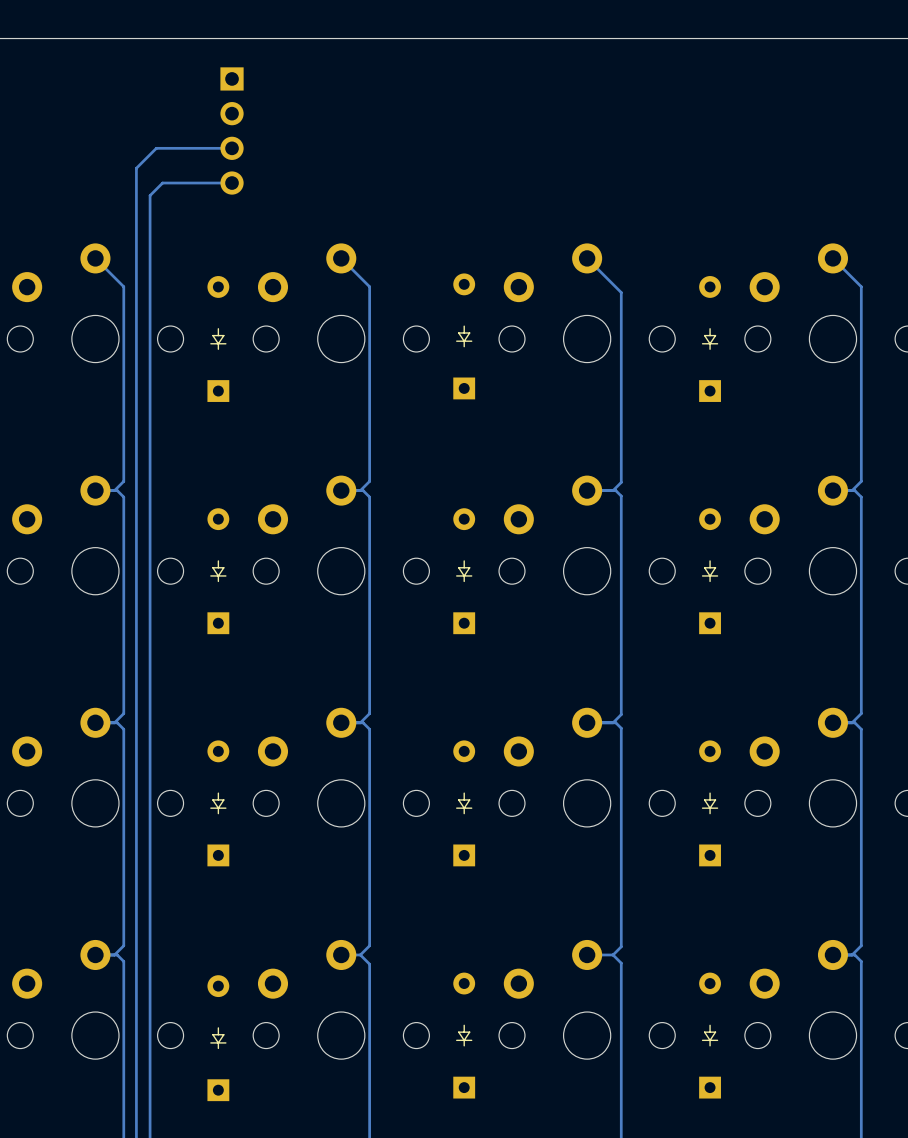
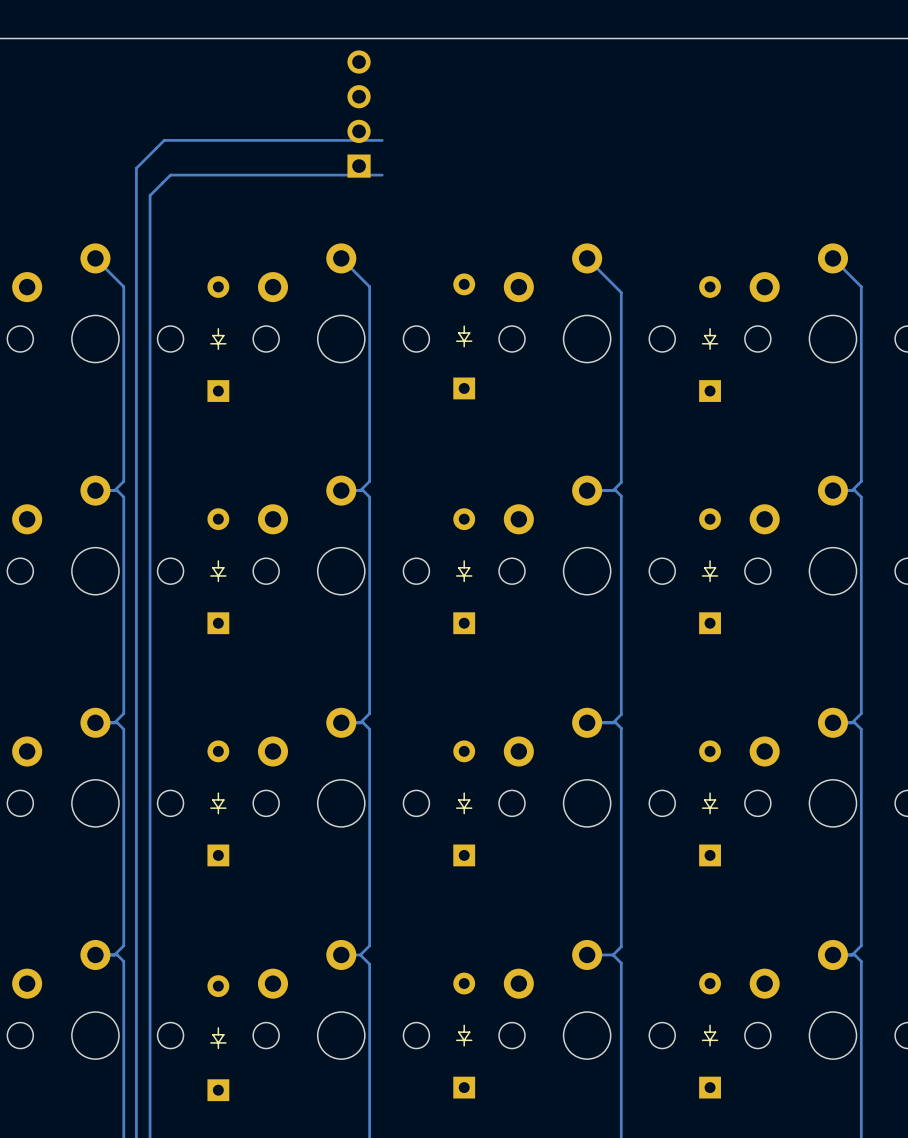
part rotation: 0° (232, 130) -> 180° (359, 114)
part position: (232, 130) -> (359, 114)
track: (232, 148) (156, 148) -> (382, 140) (164, 140) (156, 148)
track: (232, 183) (162, 183) -> (382, 175) (170, 175) (162, 183)

